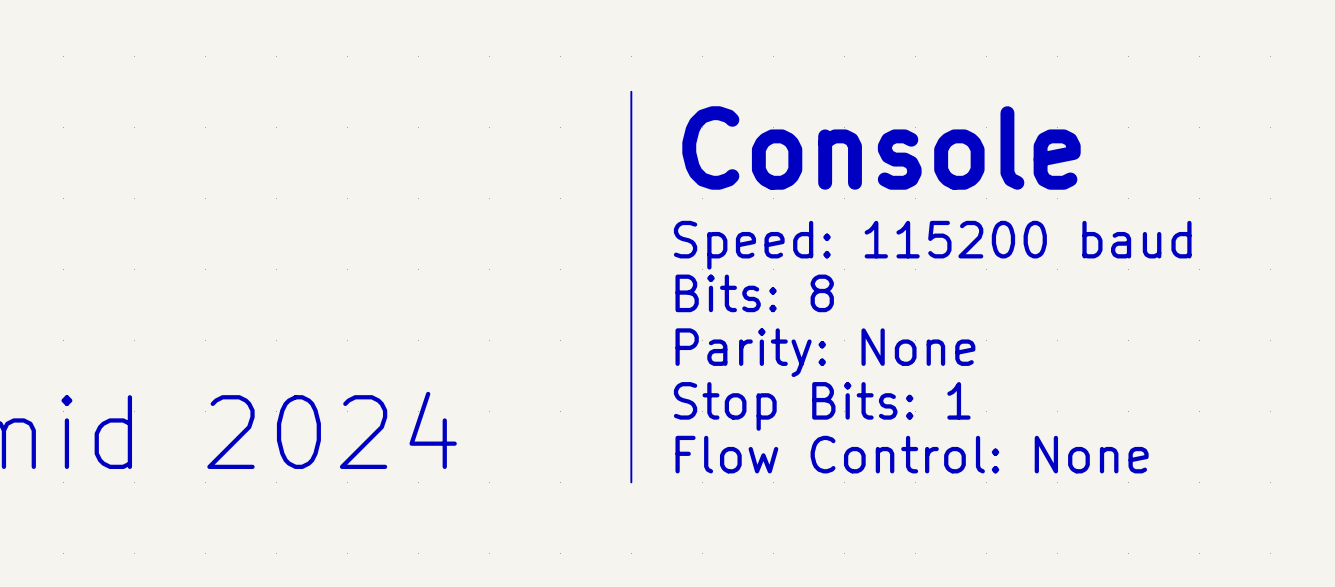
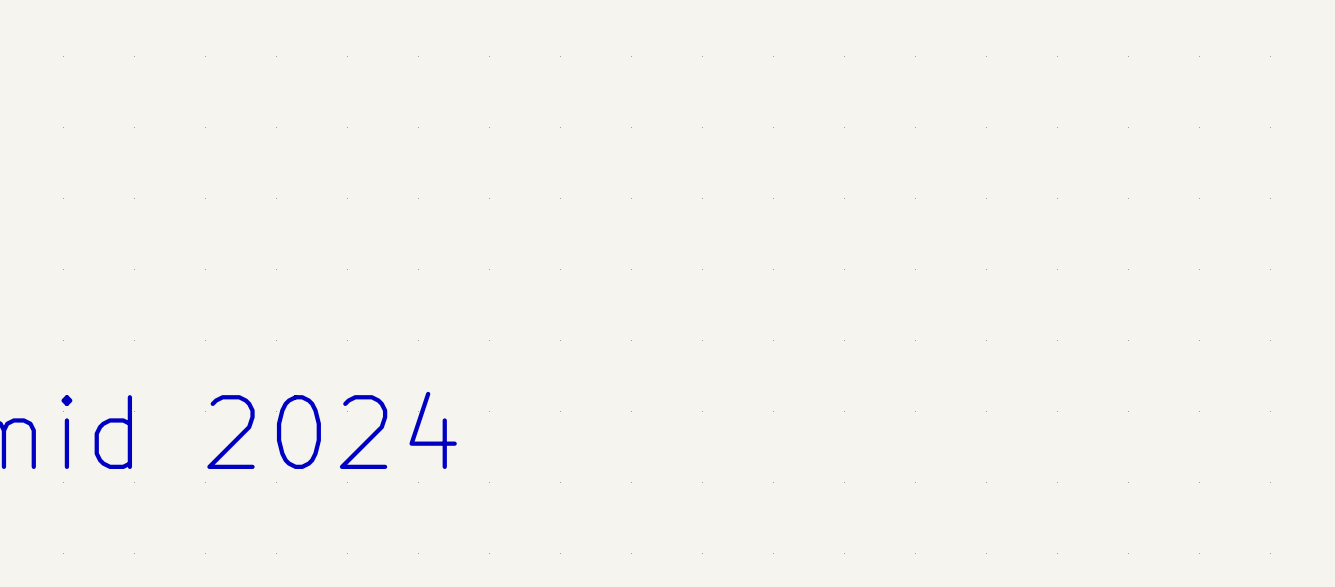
bus: (631, 91) (631, 482) -> none
text: Console (881, 147) -> none
text: Speed: 115200 baud (932, 245) -> none
text: Bits: 8 (754, 293) -> none
text: Parity: None (825, 352) -> none
text: Stop Bits: 1 (822, 406) -> none
text: Flow Control: None (912, 454) -> none

